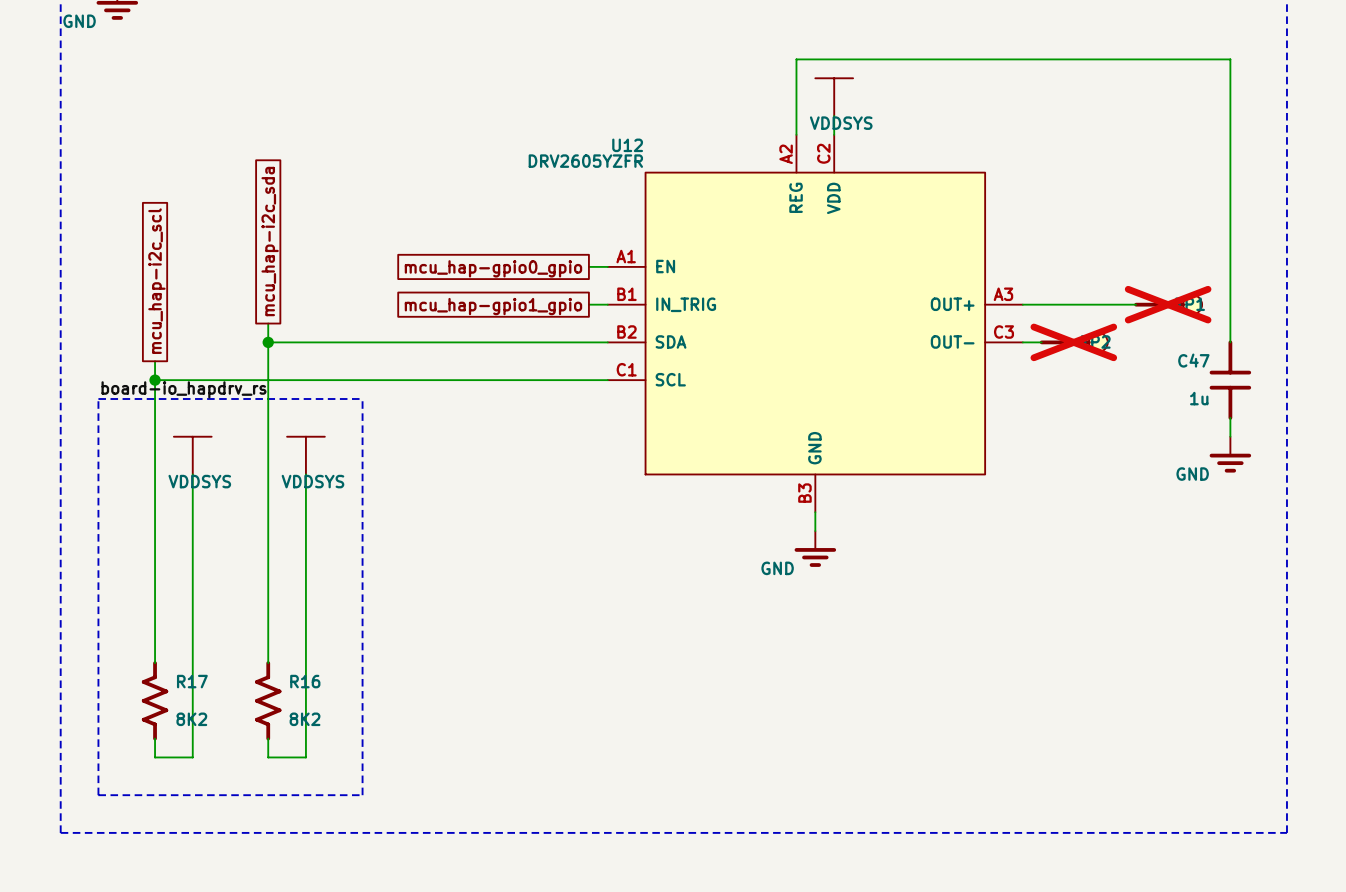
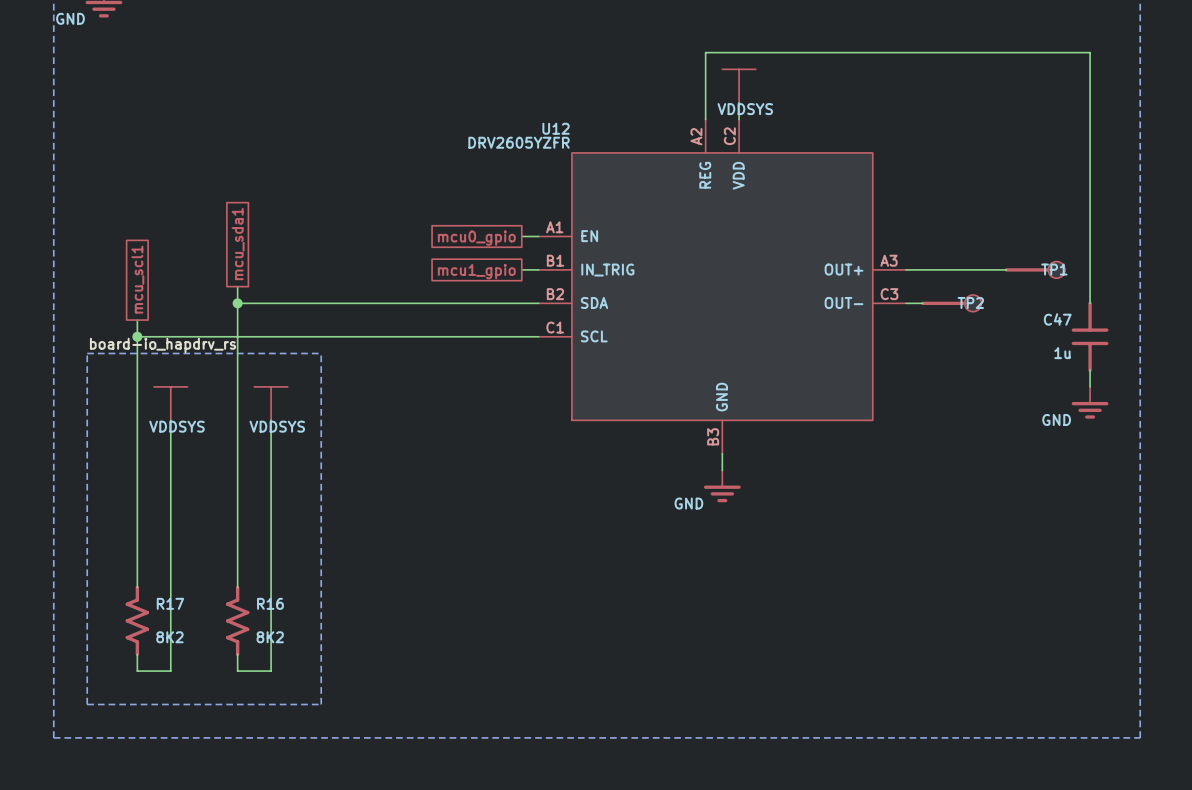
global label: mcu_hap-i2c_sda (270, 241) -> mcu_sda1 (238, 244)
global label: mcu_hap-gpio0_gpio (493, 268) -> mcu0_gpio (476, 238)
global label: mcu_hap-i2c_scl (156, 281) -> mcu_scl1 (137, 279)
TP1 do-not-place cross: (1168, 304) -> none
global label: mcu_hap-gpio1_gpio (493, 306) -> mcu1_gpio (476, 271)
TP2 do-not-place cross: (1073, 342) -> none

